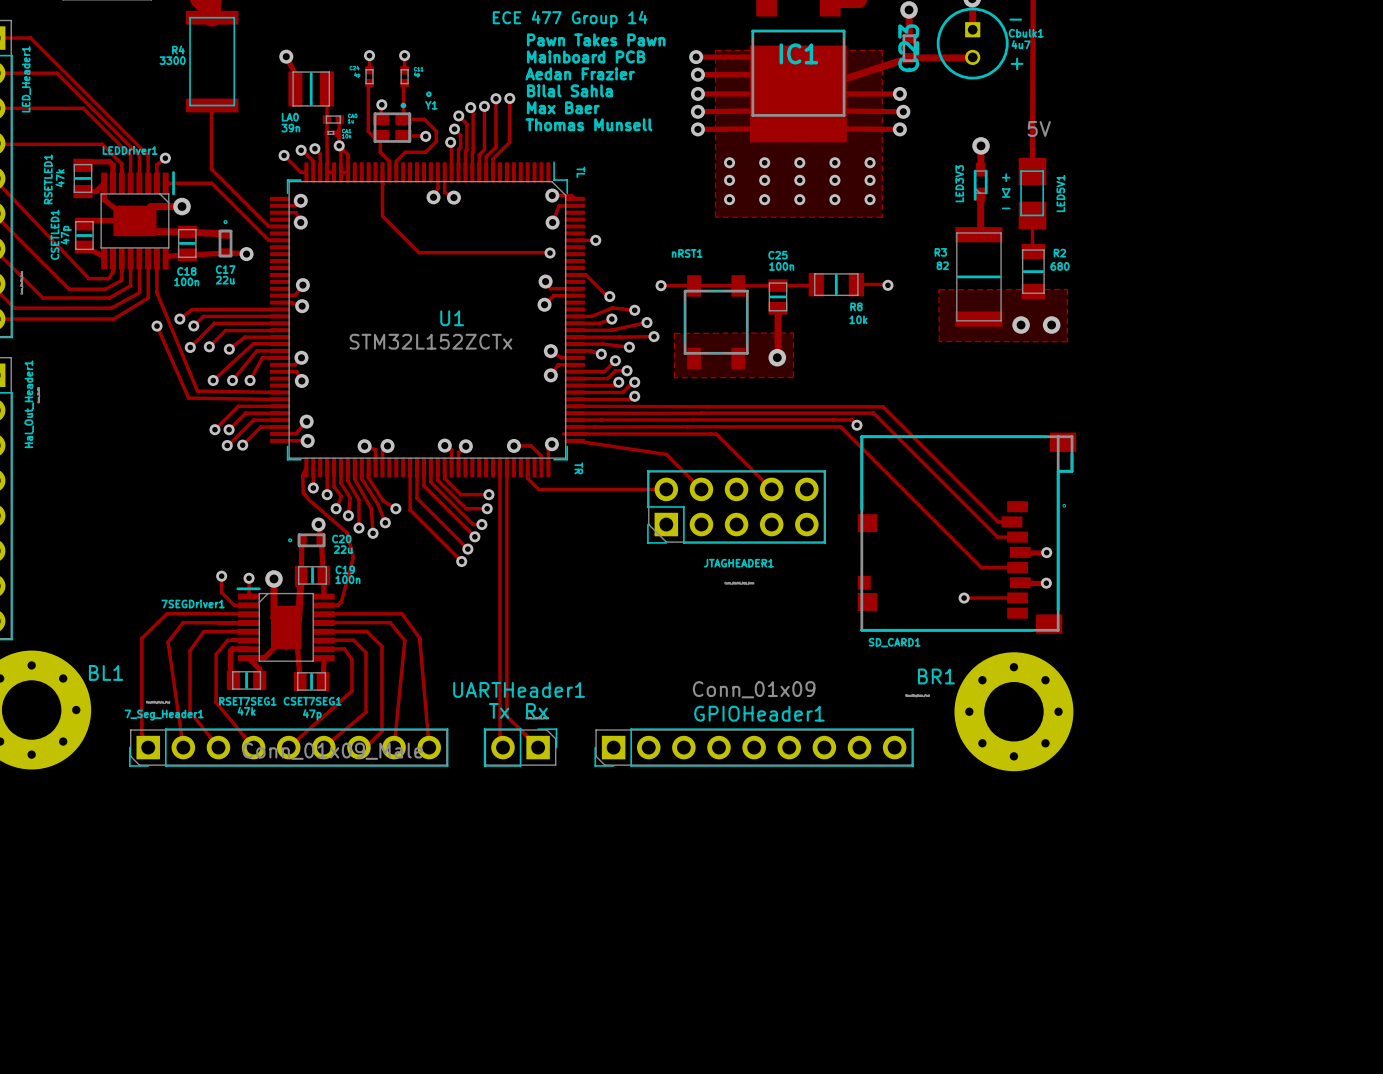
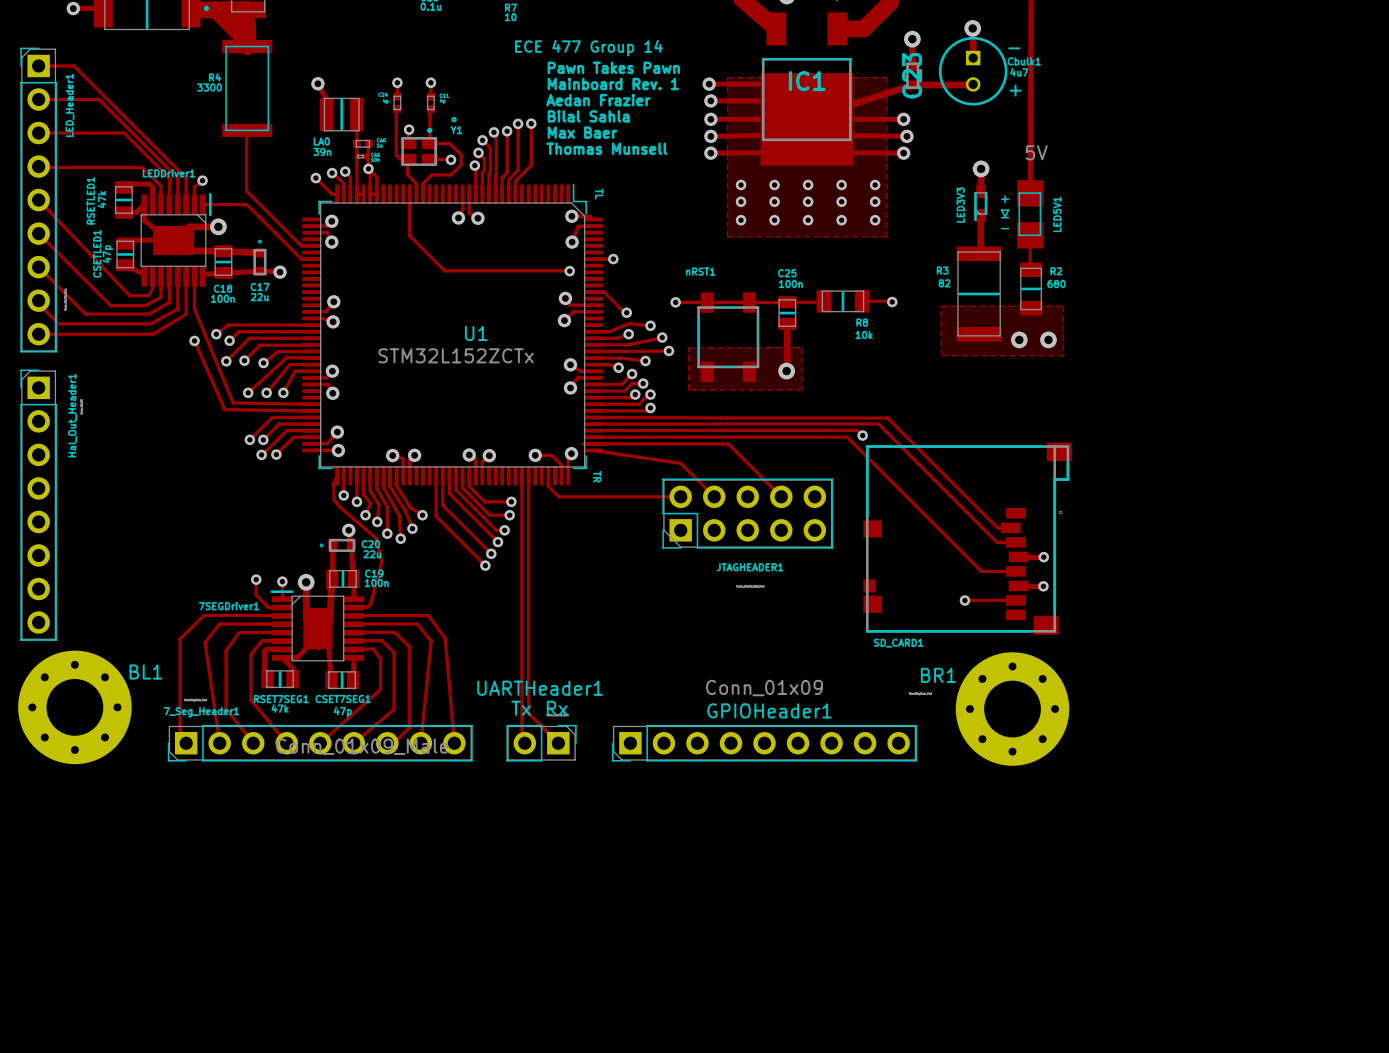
text: Mainboard PCB (586, 56) -> Mainboard Rev. 1 (613, 83)

